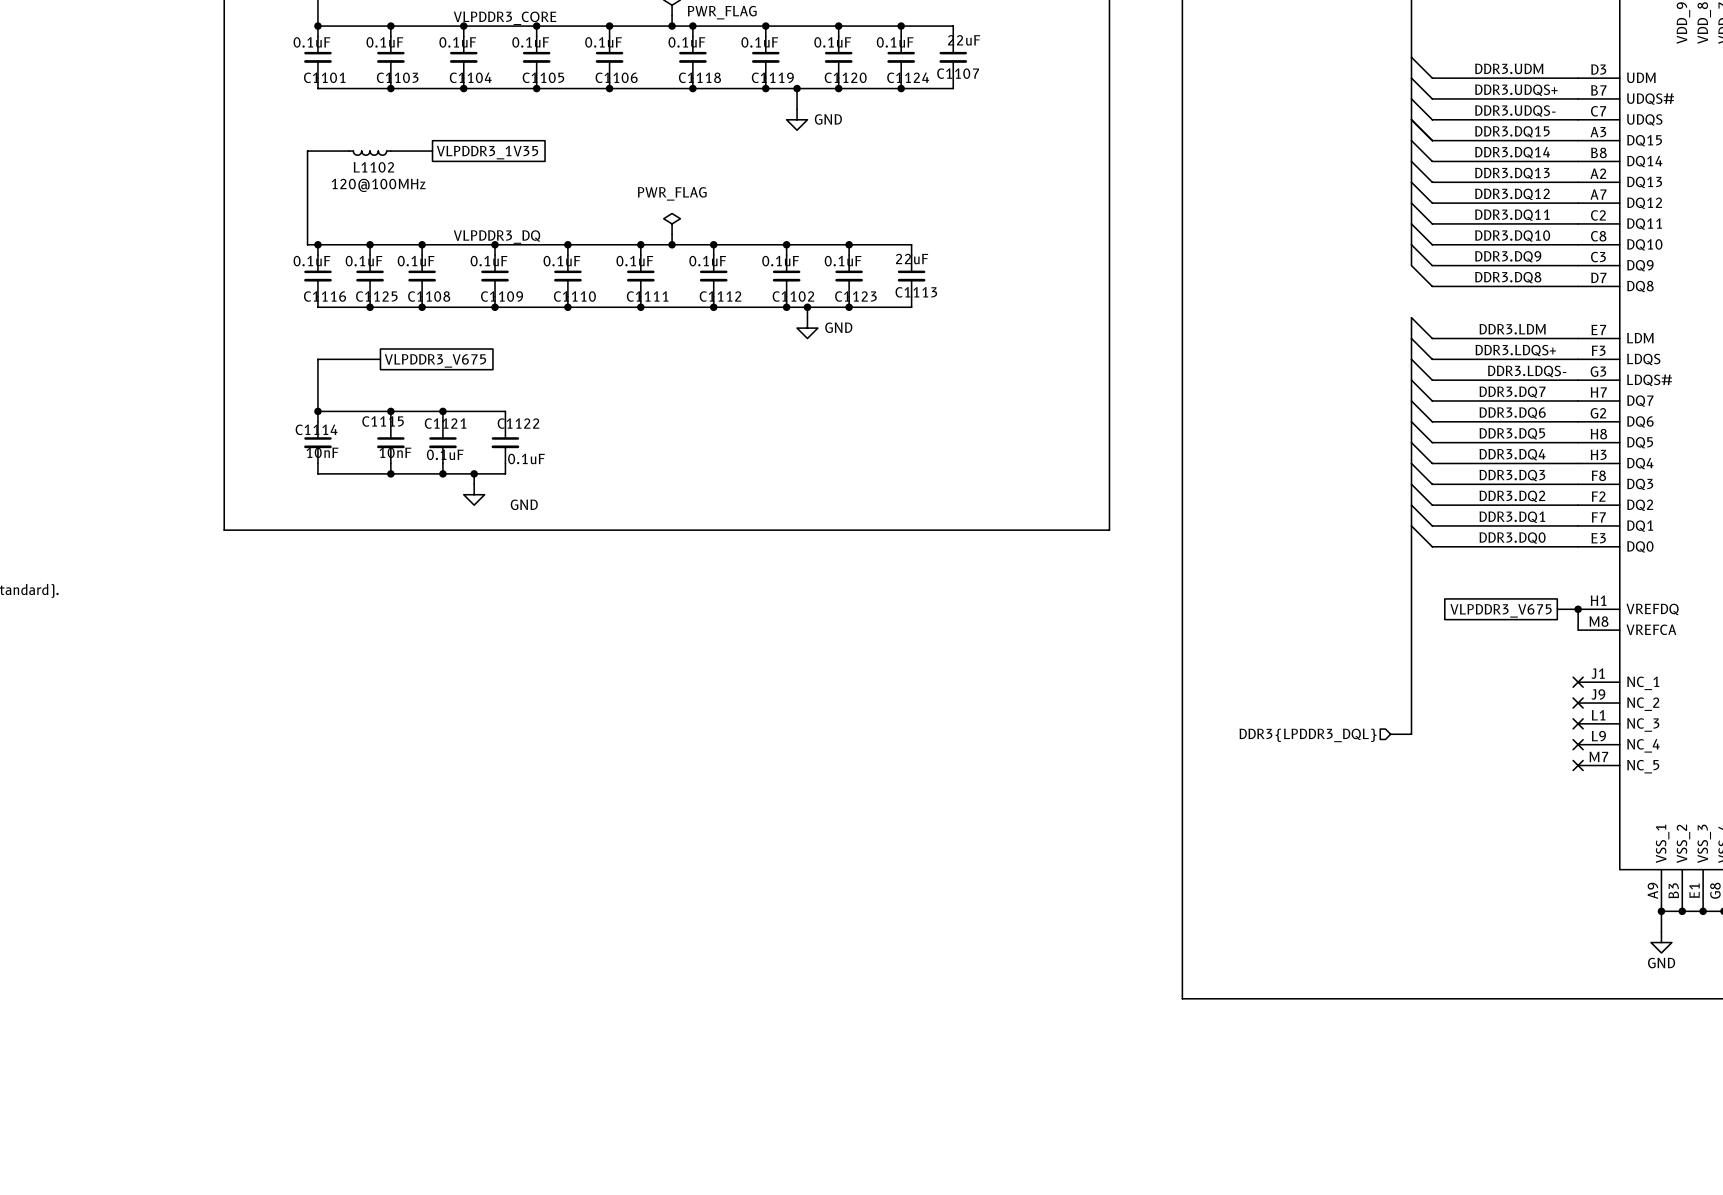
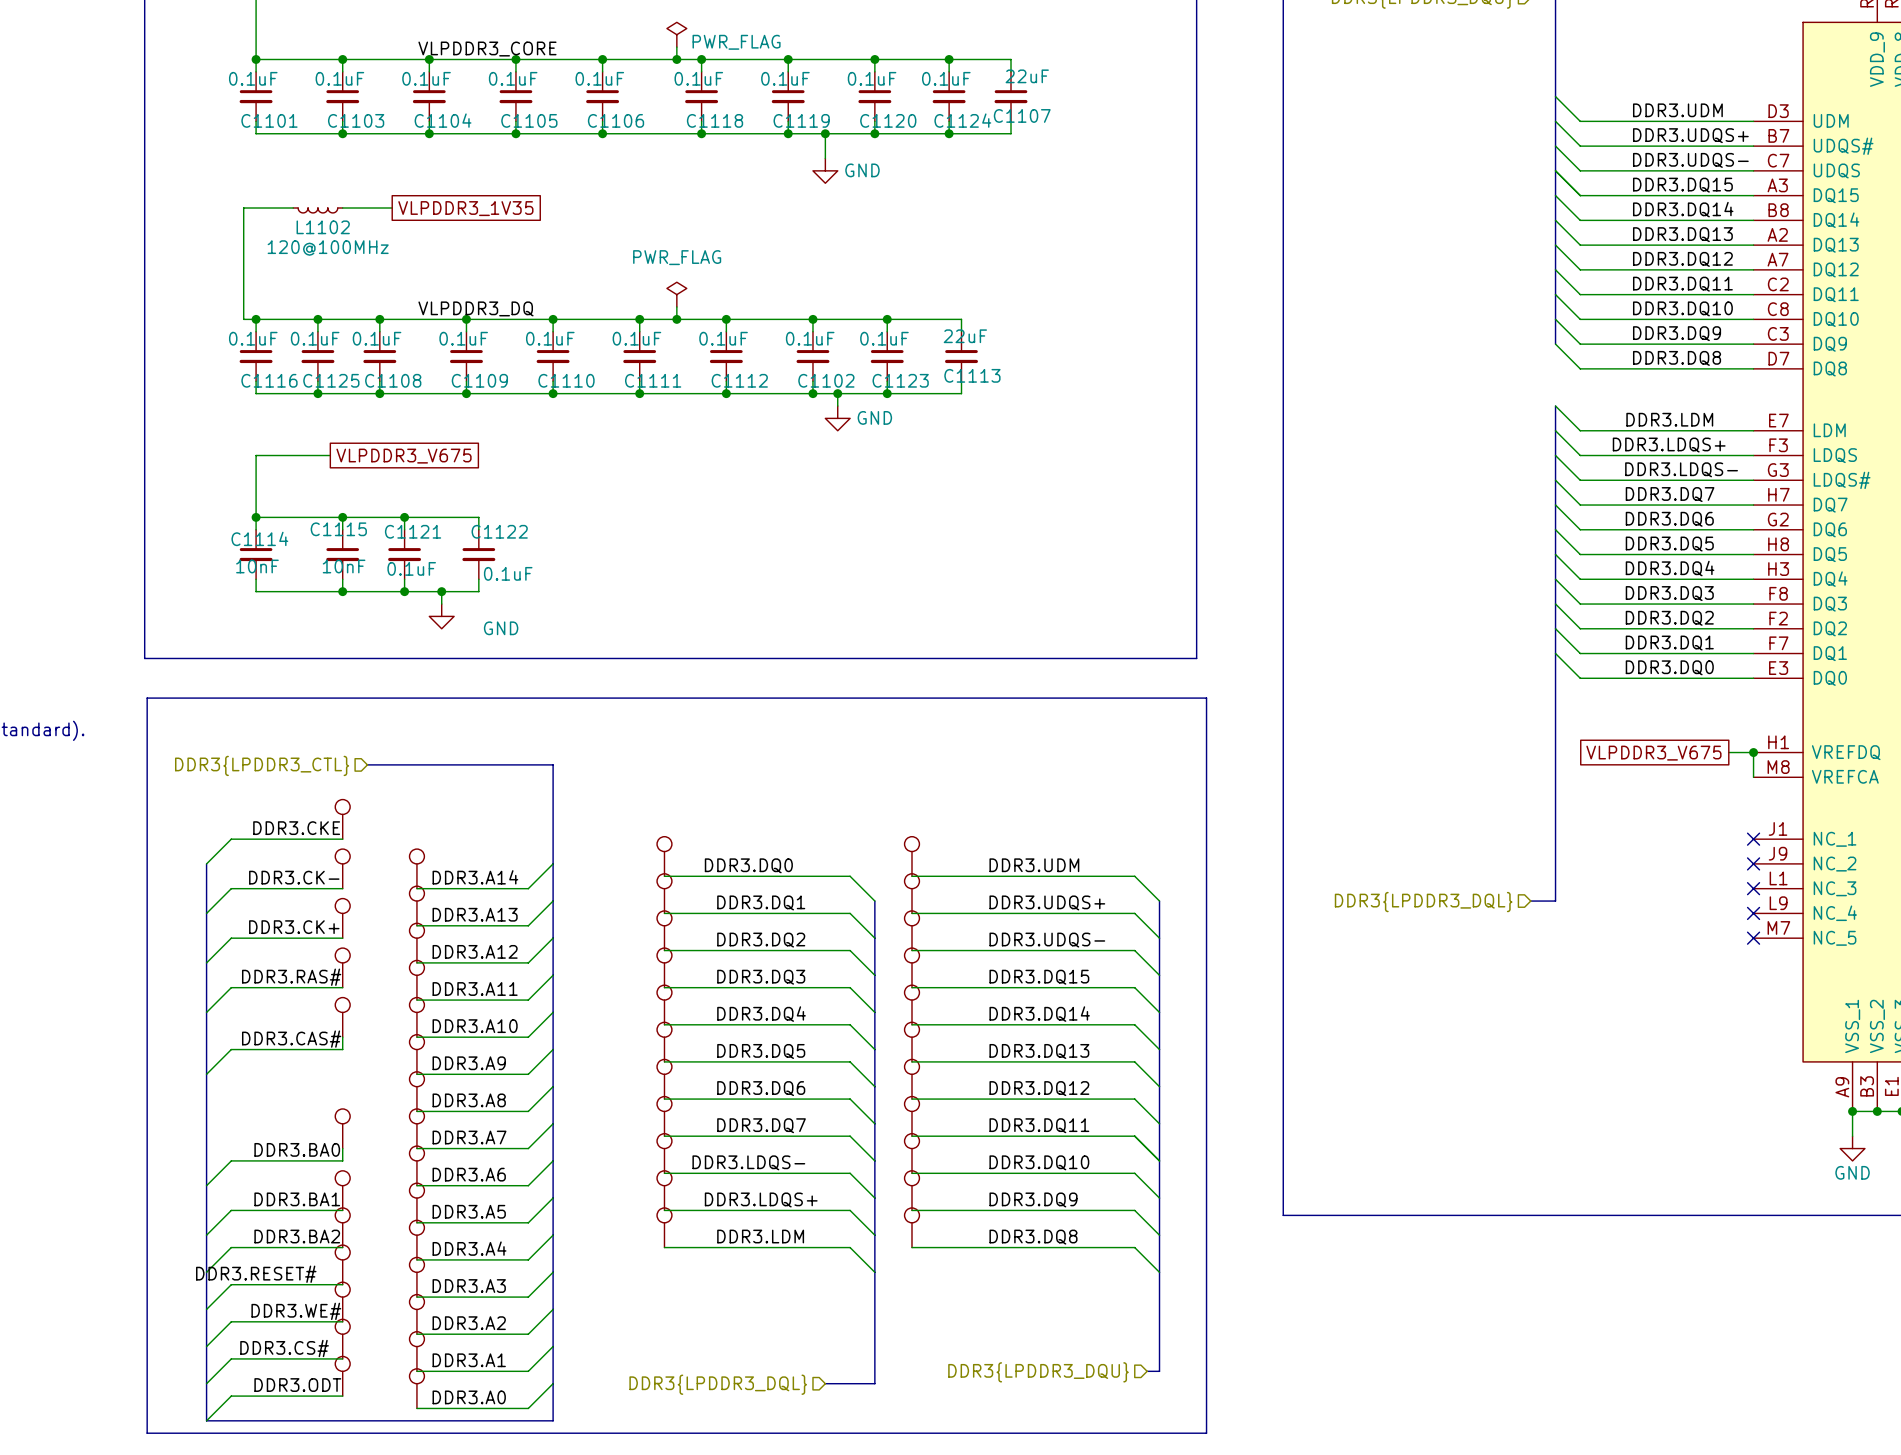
line: none -> (147, 698) (1206, 698) (1206, 1433) (147, 1433) (147, 698)
bus: none -> (367, 764) (553, 764) (553, 1420) (206, 1420) (206, 863)
hierarchical label: none -> DDR3{LPDDR3_CTL} (262, 765)
part: none -> (342, 819)
label: none -> DDR3.CKE (296, 828)
wire: none -> (342, 839) (231, 839) (206, 863)
part: none -> (664, 856)
part: none -> (911, 856)
wire: none -> (553, 863) (528, 888) (416, 888)
label: none -> DDR3.DQ0 (748, 865)
label: none -> DDR3.UDM (1034, 865)
part: none -> (342, 868)
part: none -> (416, 868)
wire: none -> (664, 876) (850, 876) (874, 901)
wire: none -> (911, 876) (1134, 876) (1159, 901)
label: none -> DDR3.CK- (294, 877)
label: none -> DDR3.A14 (475, 877)
wire: none -> (342, 888) (231, 888) (206, 913)
part: none -> (664, 893)
part: none -> (911, 893)
wire: none -> (553, 901) (528, 925) (416, 925)
bus: none -> (874, 901) (874, 1383) (825, 1383)
bus: none -> (1159, 901) (1159, 1371) (1147, 1371)
label: none -> DDR3.DQ1 (761, 902)
label: none -> DDR3.UDQS+ (1047, 902)
part: none -> (416, 905)
wire: none -> (664, 913) (850, 913) (874, 938)
wire: none -> (911, 913) (1134, 913) (1159, 938)
label: none -> DDR3.A13 (475, 914)
part: none -> (342, 918)
label: none -> DDR3.CK+ (294, 927)
part: none -> (664, 930)
part: none -> (911, 930)
wire: none -> (342, 938) (231, 938) (206, 962)
wire: none -> (553, 938) (528, 962) (416, 962)
label: none -> DDR3.DQ2 (761, 940)
label: none -> DDR3.UDQS- (1047, 940)
part: none -> (416, 943)
wire: none -> (664, 950) (850, 950) (874, 975)
wire: none -> (911, 950) (1134, 950) (1159, 975)
label: none -> DDR3.A12 (475, 951)
part: none -> (342, 967)
part: none -> (664, 967)
part: none -> (911, 967)
wire: none -> (553, 975) (528, 1000) (416, 1000)
label: none -> DDR3.RAS# (291, 977)
label: none -> DDR3.DQ3 (761, 977)
label: none -> DDR3.DQ15 (1039, 977)
part: none -> (416, 980)
wire: none -> (342, 987) (231, 987) (206, 1012)
wire: none -> (664, 987) (850, 987) (874, 1012)
wire: none -> (911, 987) (1134, 987) (1159, 1012)
label: none -> DDR3.A11 (475, 989)
part: none -> (664, 1005)
part: none -> (911, 1005)
wire: none -> (553, 1012) (528, 1037) (416, 1037)
label: none -> DDR3.DQ4 (761, 1014)
label: none -> DDR3.DQ14 (1039, 1014)
part: none -> (342, 1017)
part: none -> (416, 1017)
wire: none -> (664, 1024) (850, 1024) (874, 1049)
wire: none -> (911, 1024) (1134, 1024) (1159, 1049)
label: none -> DDR3.A10 (475, 1026)
wire: none -> (342, 1037) (342, 1049) (231, 1049) (206, 1074)
label: none -> DDR3.CAS# (291, 1039)
part: none -> (664, 1042)
part: none -> (911, 1042)
wire: none -> (553, 1049) (528, 1074) (416, 1074)
label: none -> DDR3.DQ5 (761, 1051)
label: none -> DDR3.DQ13 (1039, 1051)
part: none -> (416, 1054)
wire: none -> (664, 1061) (850, 1061) (874, 1086)
wire: none -> (911, 1061) (1134, 1061) (1159, 1086)
label: none -> DDR3.A9 (469, 1063)
part: none -> (664, 1079)
part: none -> (911, 1079)
wire: none -> (553, 1086) (528, 1111) (416, 1111)
label: none -> DDR3.DQ6 (761, 1088)
label: none -> DDR3.DQ12 (1039, 1088)
part: none -> (416, 1091)
wire: none -> (664, 1099) (850, 1099) (874, 1123)
wire: none -> (911, 1099) (1134, 1099) (1159, 1123)
label: none -> DDR3.A8 (469, 1100)
part: none -> (664, 1116)
part: none -> (911, 1116)
wire: none -> (553, 1123) (528, 1148) (416, 1148)
label: none -> DDR3.DQ7 (761, 1125)
label: none -> DDR3.DQ11 (1039, 1125)
part: none -> (342, 1128)
part: none -> (416, 1128)
wire: none -> (664, 1136) (850, 1136) (874, 1160)
wire: none -> (911, 1136) (1134, 1136) (1159, 1160)
label: none -> DDR3.A7 (469, 1137)
wire: none -> (342, 1148) (342, 1160) (231, 1160) (206, 1185)
label: none -> DDR3.BA0 (297, 1149)
part: none -> (664, 1153)
part: none -> (911, 1153)
wire: none -> (553, 1160) (528, 1185) (416, 1185)
label: none -> DDR3.LDQS- (748, 1162)
label: none -> DDR3.DQ10 (1039, 1162)
part: none -> (416, 1165)
wire: none -> (664, 1173) (850, 1173) (874, 1198)
wire: none -> (911, 1173) (1134, 1173) (1159, 1198)
label: none -> DDR3.A6 (469, 1174)
part: none -> (342, 1190)
part: none -> (664, 1190)
part: none -> (911, 1190)
wire: none -> (553, 1198) (528, 1222) (416, 1222)
label: none -> DDR3.BA1 (297, 1199)
label: none -> DDR3.LDQS+ (761, 1199)
label: none -> DDR3.DQ9 (1033, 1199)
part: none -> (416, 1203)
wire: none -> (342, 1210) (231, 1210) (206, 1235)
wire: none -> (664, 1210) (850, 1210) (874, 1235)
wire: none -> (911, 1210) (1134, 1210) (1159, 1235)
label: none -> DDR3.A5 (469, 1211)
part: none -> (342, 1227)
part: none -> (664, 1227)
part: none -> (911, 1227)
wire: none -> (553, 1235) (528, 1259) (416, 1259)
label: none -> DDR3.BA2 (297, 1236)
label: none -> DDR3.LDM (760, 1236)
label: none -> DDR3.DQ8 (1033, 1237)
part: none -> (416, 1240)
wire: none -> (342, 1247) (231, 1247) (206, 1272)
wire: none -> (664, 1247) (850, 1247) (874, 1272)
wire: none -> (911, 1247) (1134, 1247) (1159, 1272)
label: none -> DDR3.A4 (469, 1248)
part: none -> (342, 1264)
wire: none -> (553, 1272) (528, 1297) (416, 1297)
label: none -> DDR3.RESET# (256, 1274)
part: none -> (416, 1277)
wire: none -> (342, 1284) (231, 1284) (206, 1309)
label: none -> DDR3.A3 (469, 1286)
part: none -> (342, 1302)
wire: none -> (553, 1309) (528, 1334) (416, 1334)
label: none -> DDR3.WE# (296, 1311)
part: none -> (416, 1314)
wire: none -> (342, 1321) (231, 1321) (206, 1346)
label: none -> DDR3.A2 (469, 1323)
part: none -> (342, 1339)
wire: none -> (553, 1346) (528, 1371) (416, 1371)
label: none -> DDR3.CS# (284, 1348)
part: none -> (416, 1351)
wire: none -> (342, 1358) (231, 1358) (206, 1383)
label: none -> DDR3.A1 (469, 1360)
hierarchical label: none -> DDR3{LPDDR3_DQU} (1038, 1372)
part: none -> (342, 1376)
wire: none -> (553, 1383) (528, 1408) (416, 1408)
label: none -> DDR3.ODT (297, 1385)
hierarchical label: none -> DDR3{LPDDR3_DQL} (718, 1384)
part: none -> (416, 1388)
wire: none -> (342, 1396) (231, 1396) (206, 1420)
label: none -> DDR3.A0 (469, 1397)

